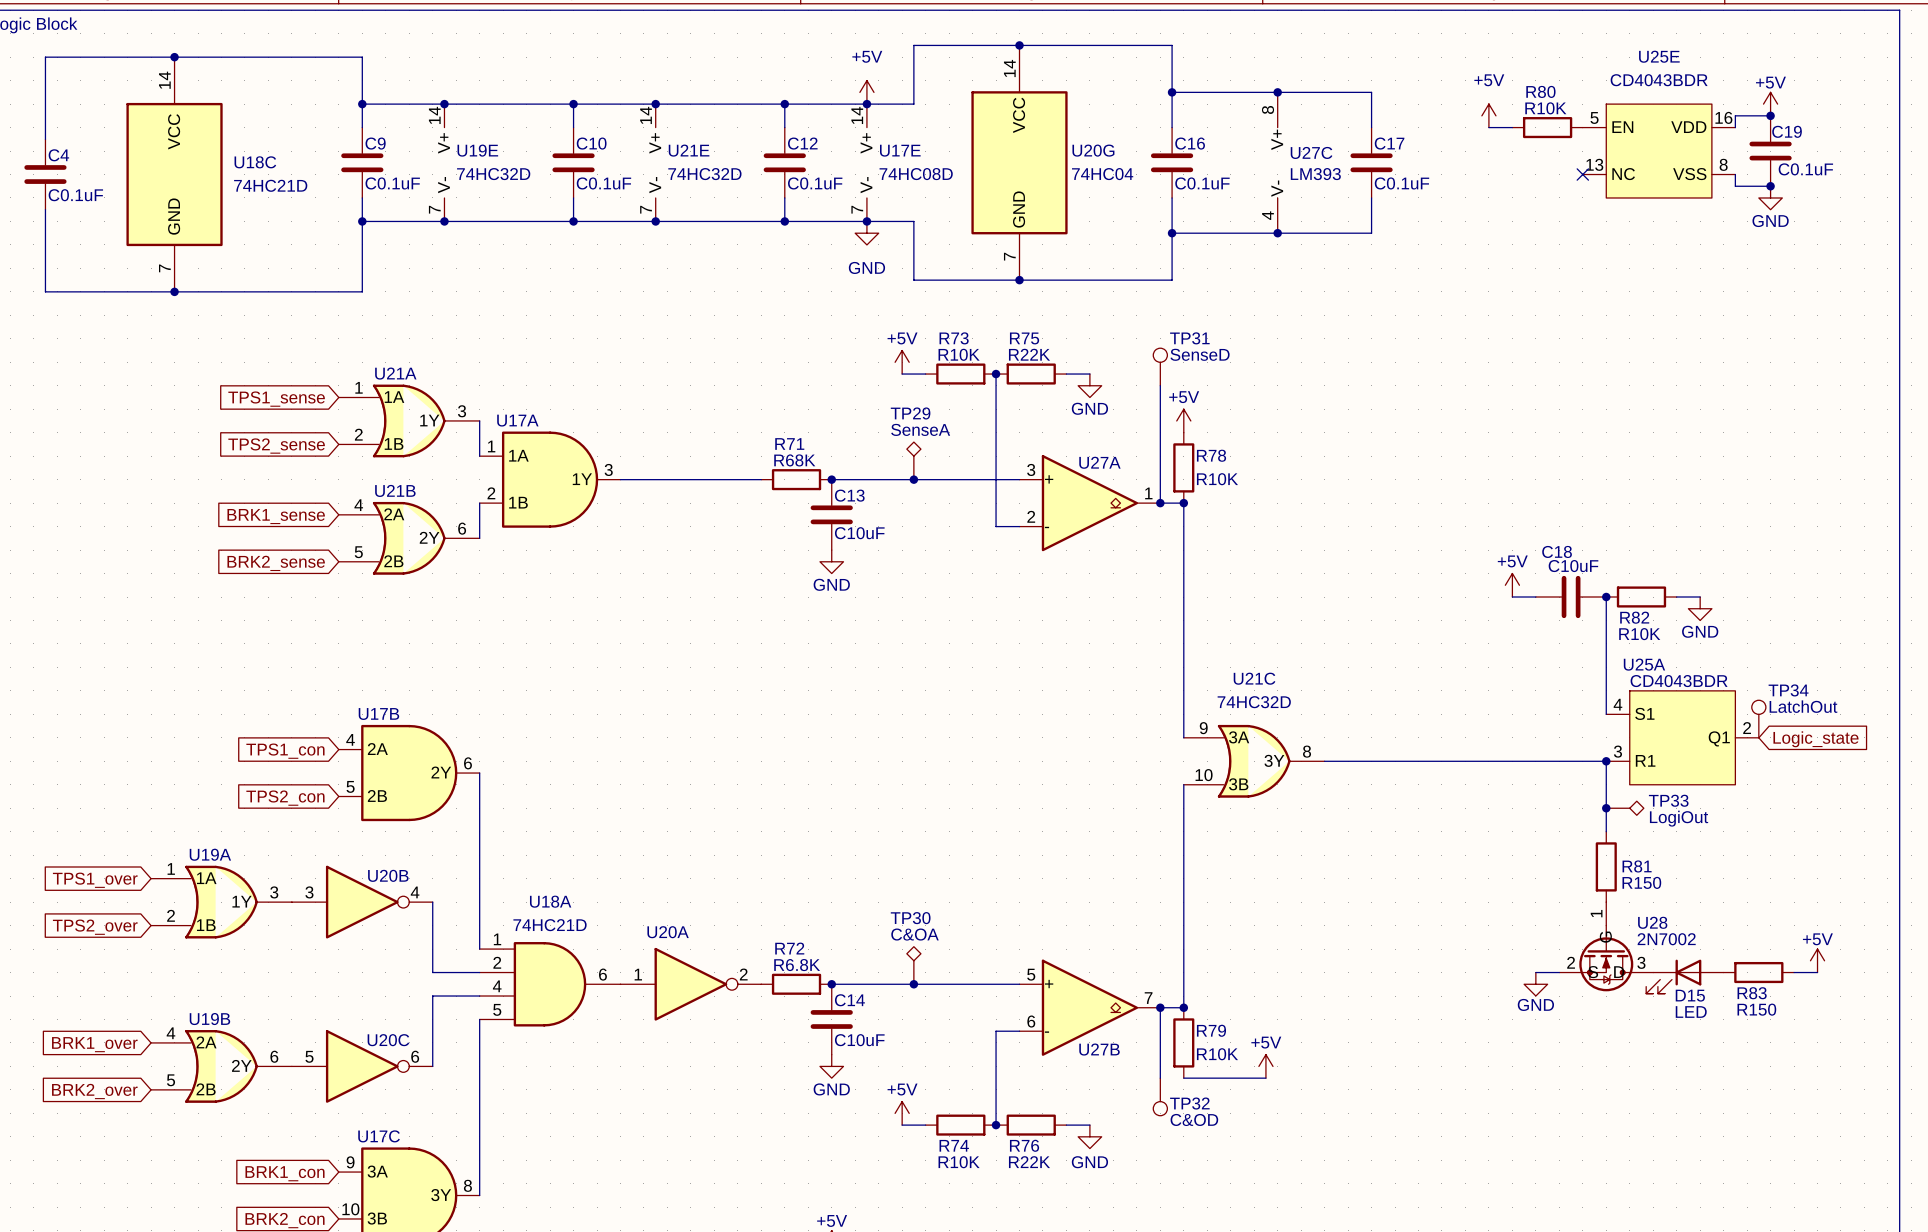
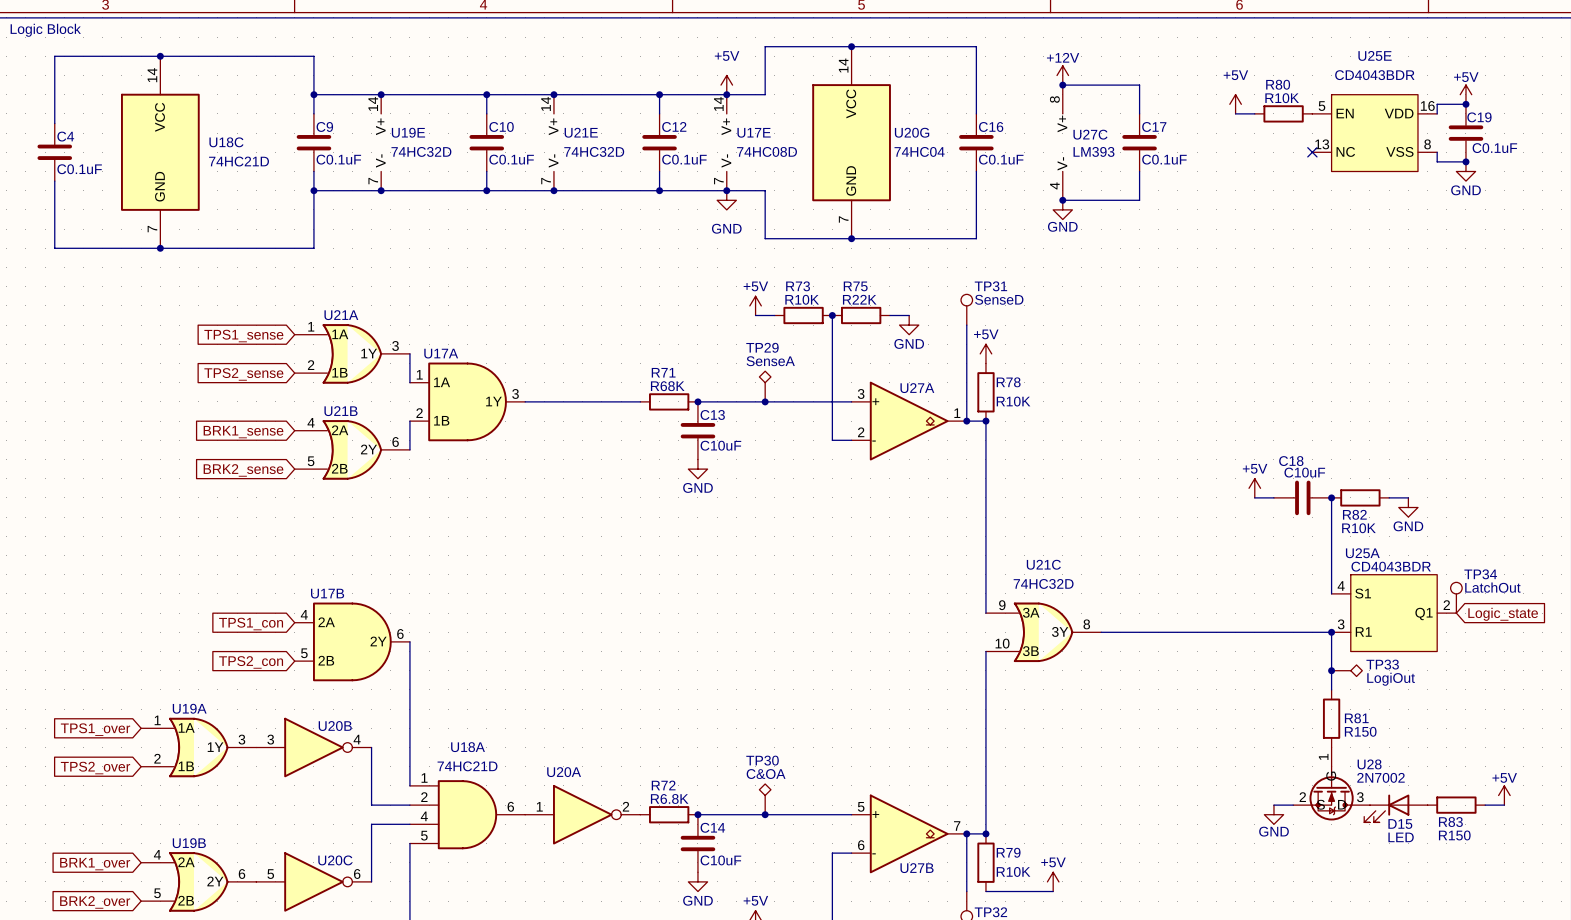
power symbol: none -> +12V (1062, 75)
wire: (1172, 92) (1277, 92) -> none
junction: (1172, 92) -> none
wire: (1172, 233) (1277, 233) -> none
junction: (1172, 233) -> none
power symbol: none -> GND (1062, 209)

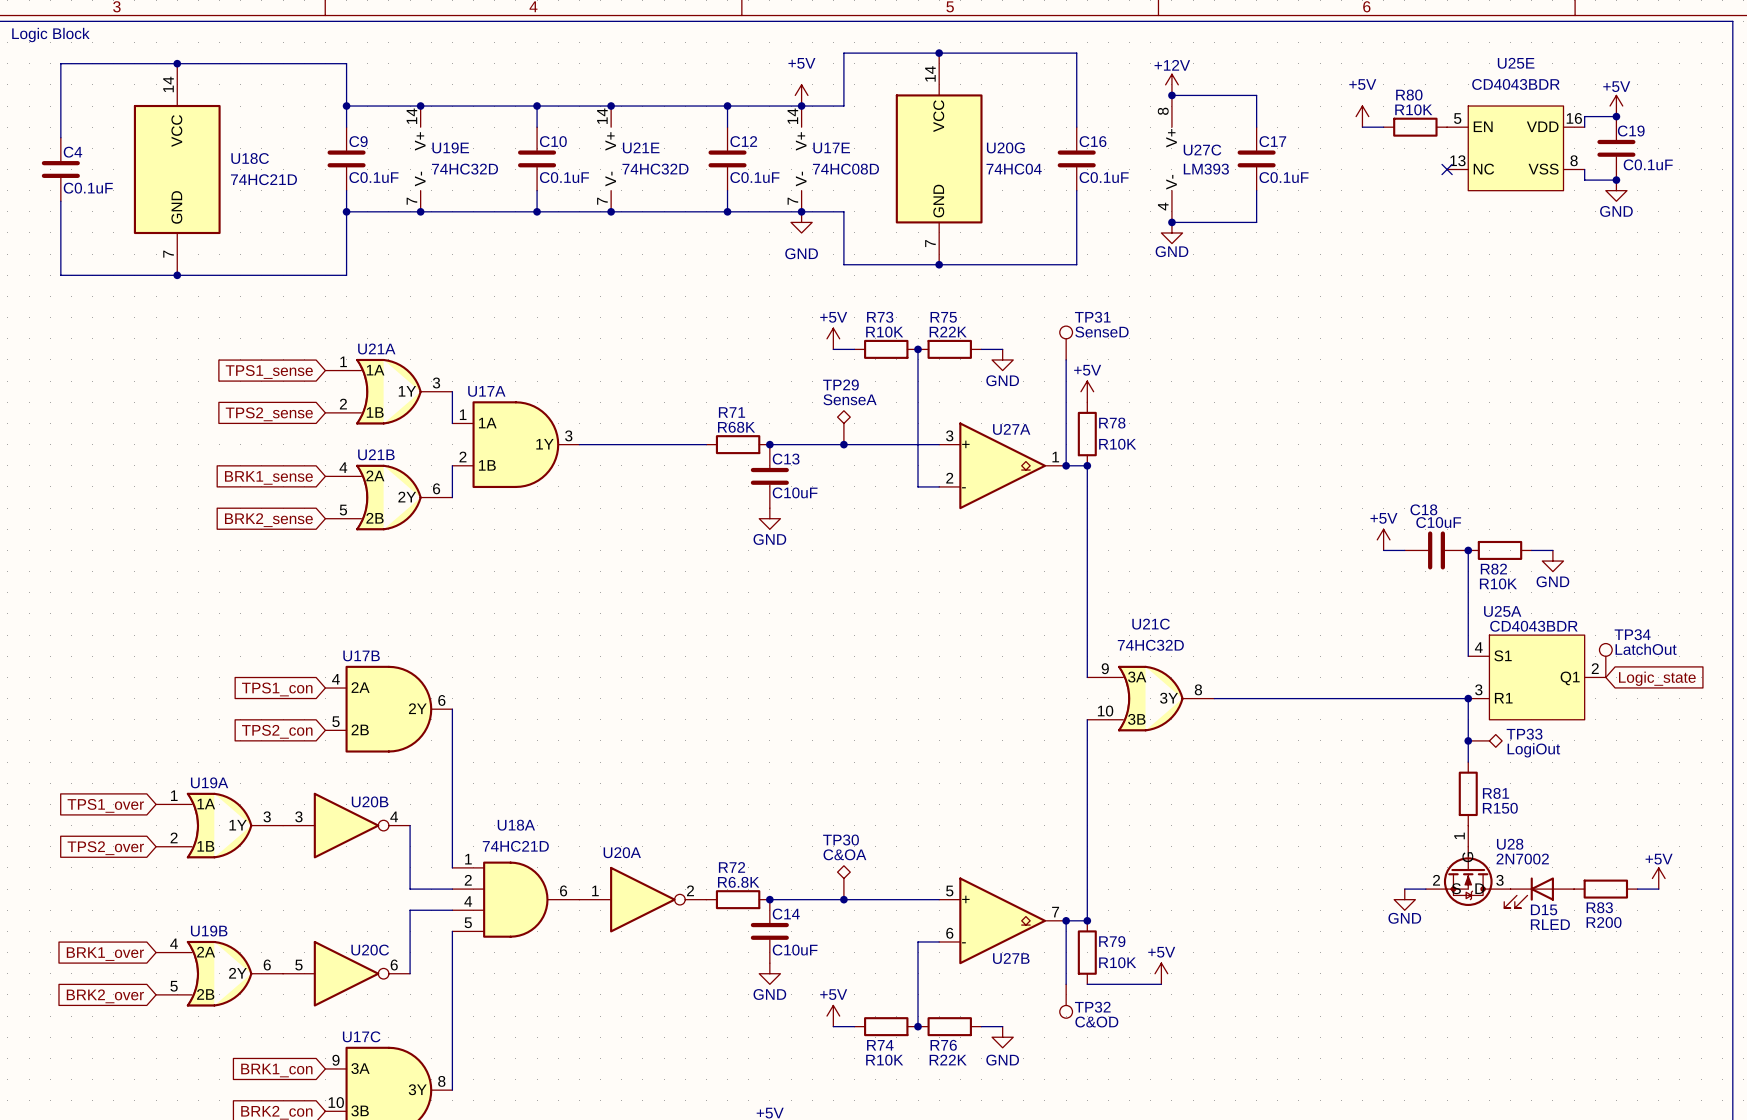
R83 value: R150 (1454, 835) -> R200 (1604, 922)
D15 value: LED (1401, 837) -> RLED (1550, 924)

